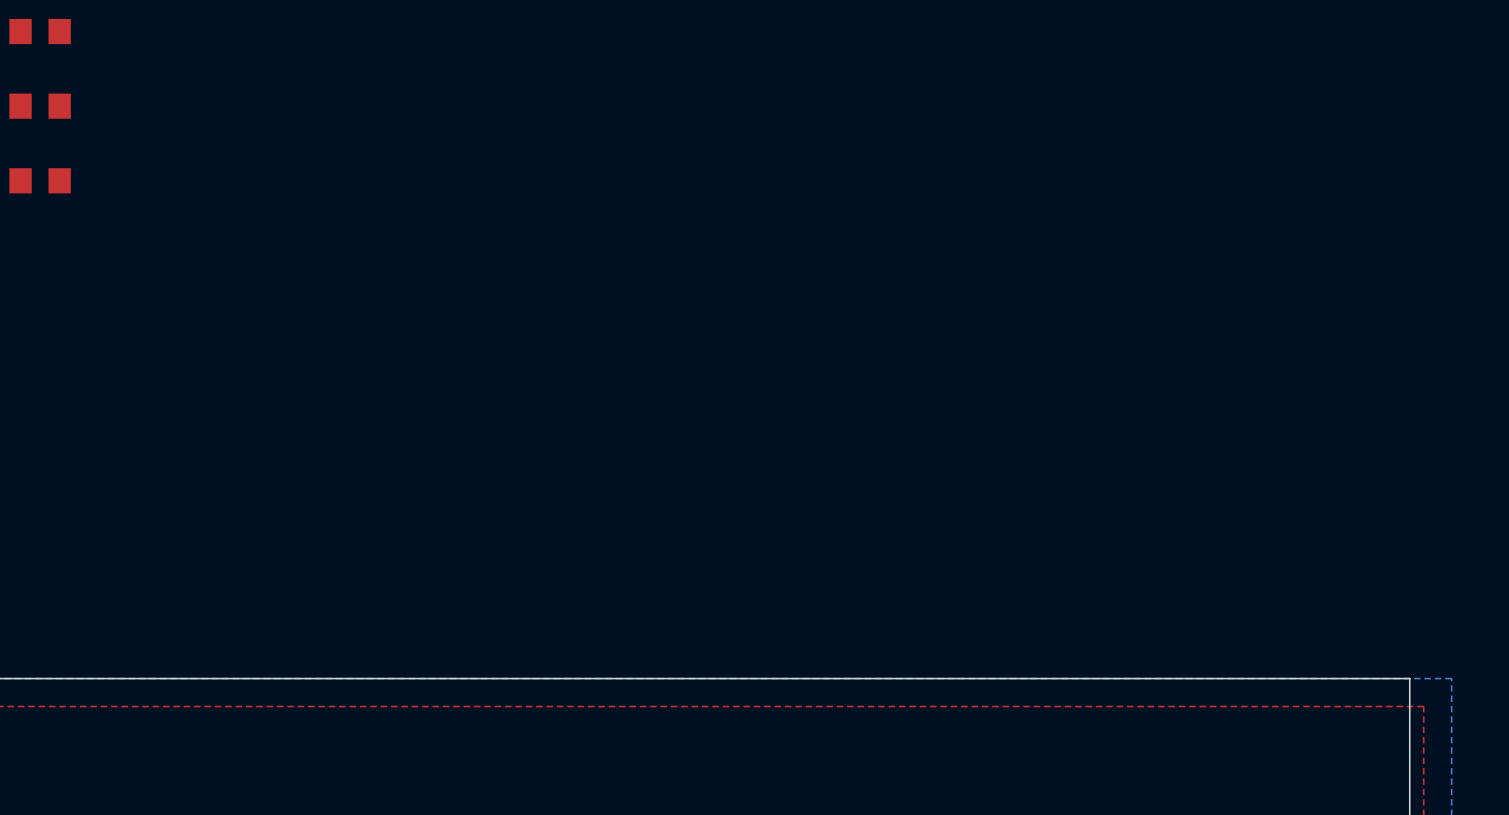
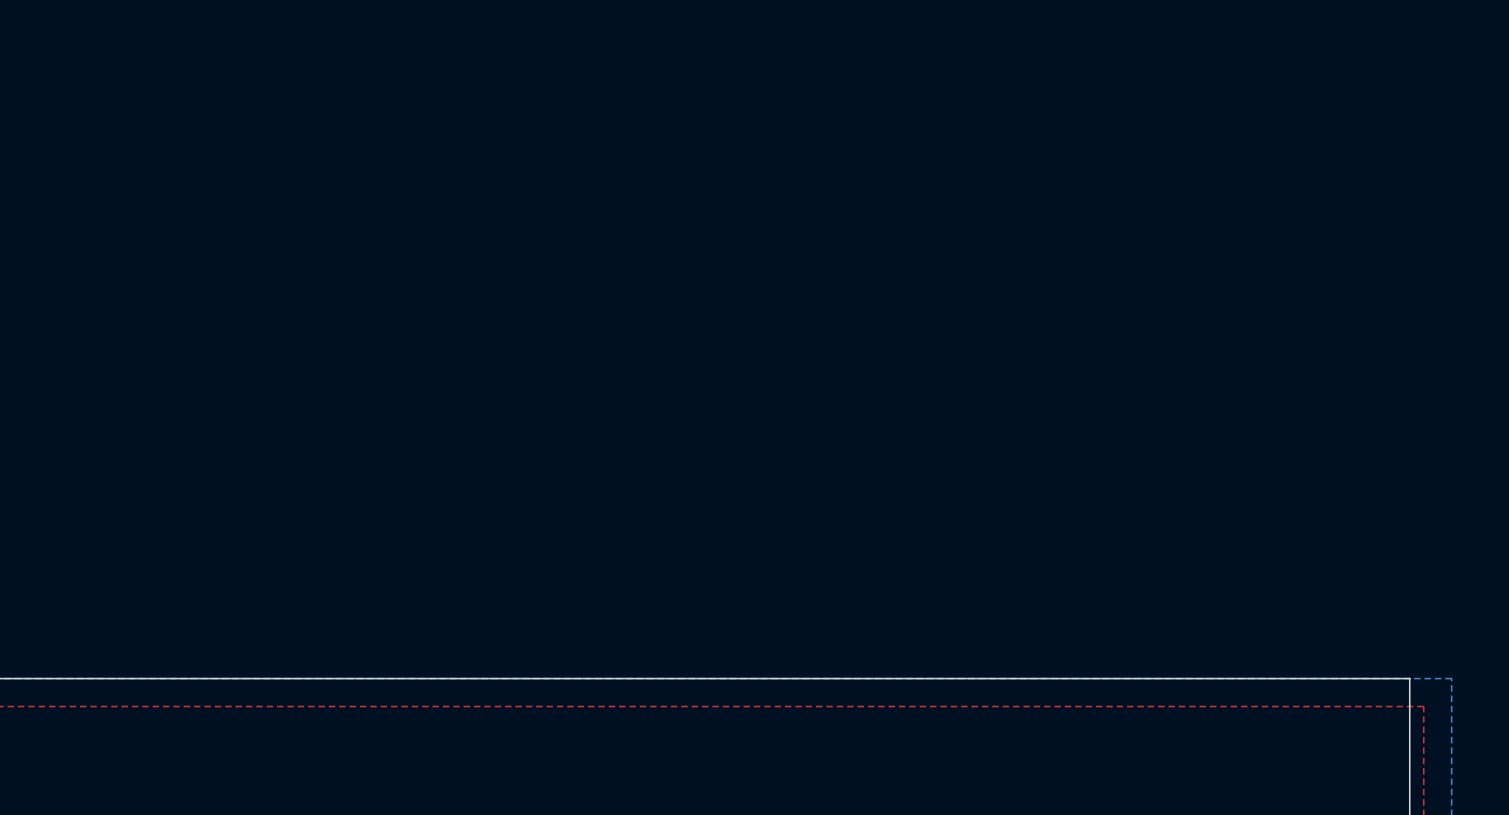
part: (40, 31) -> none
part: (40, 106) -> none
part: (40, 180) -> none

